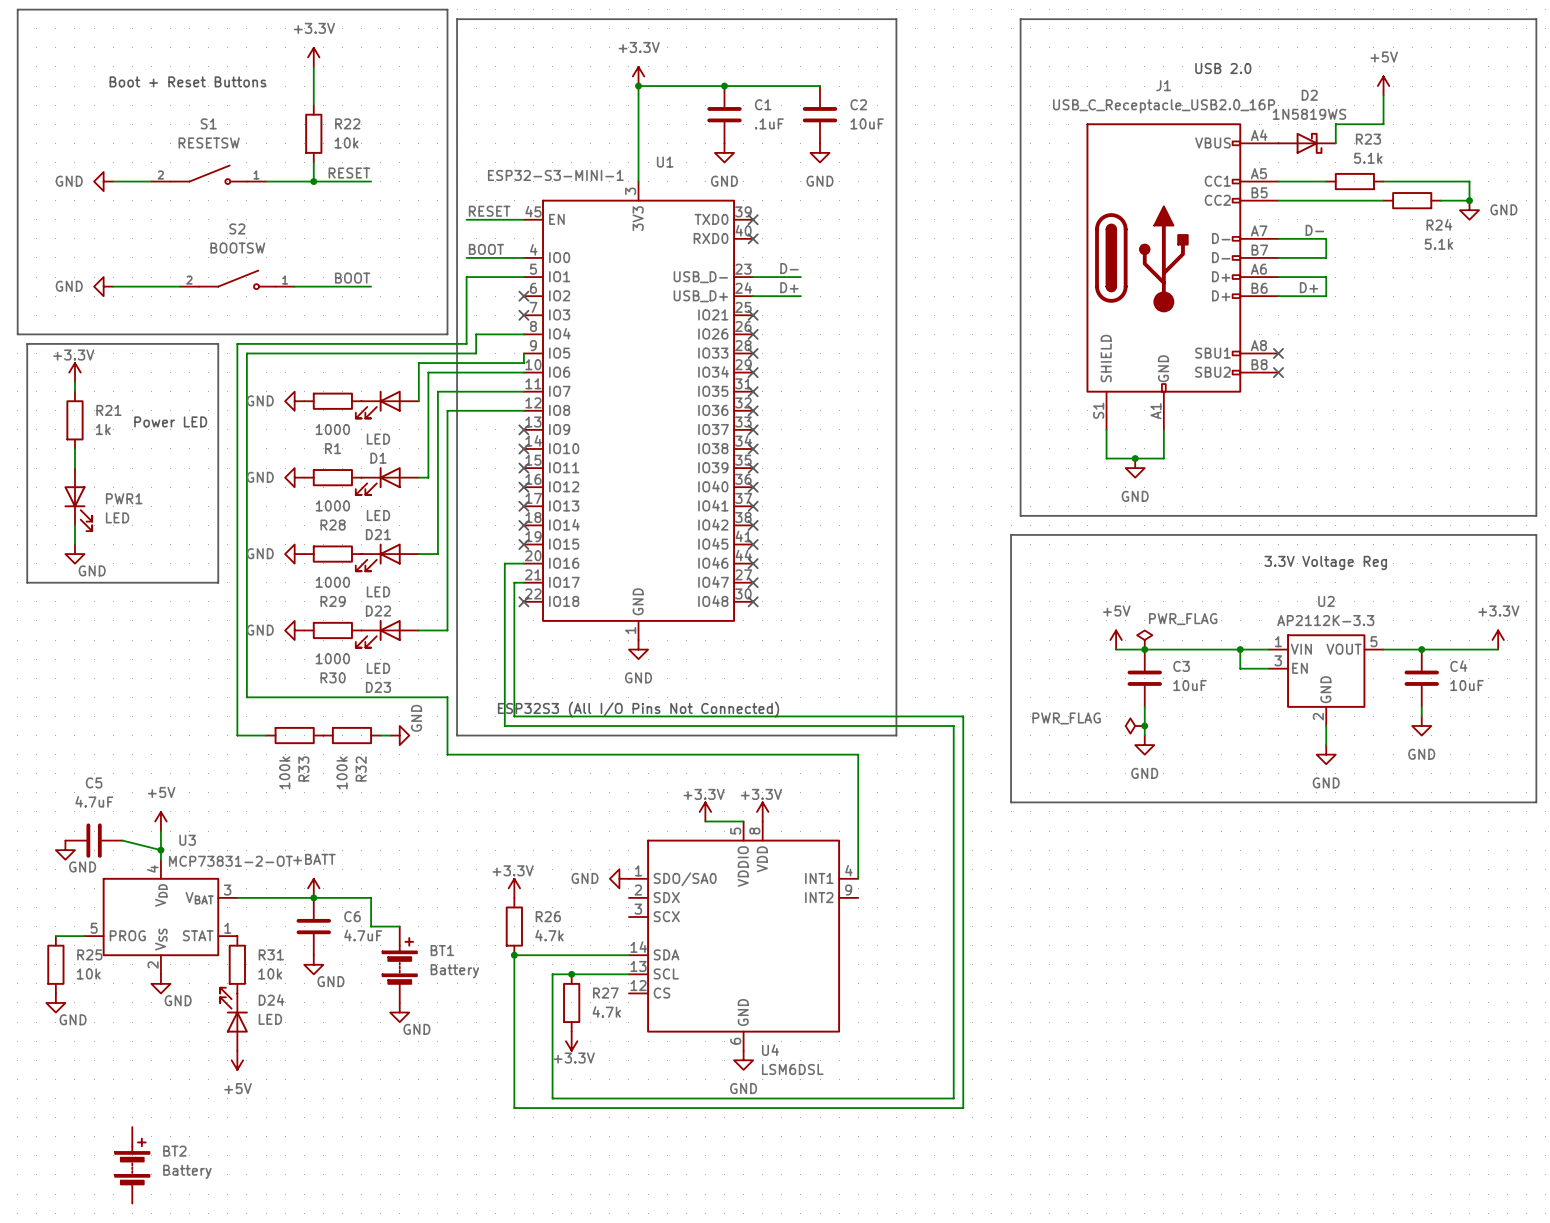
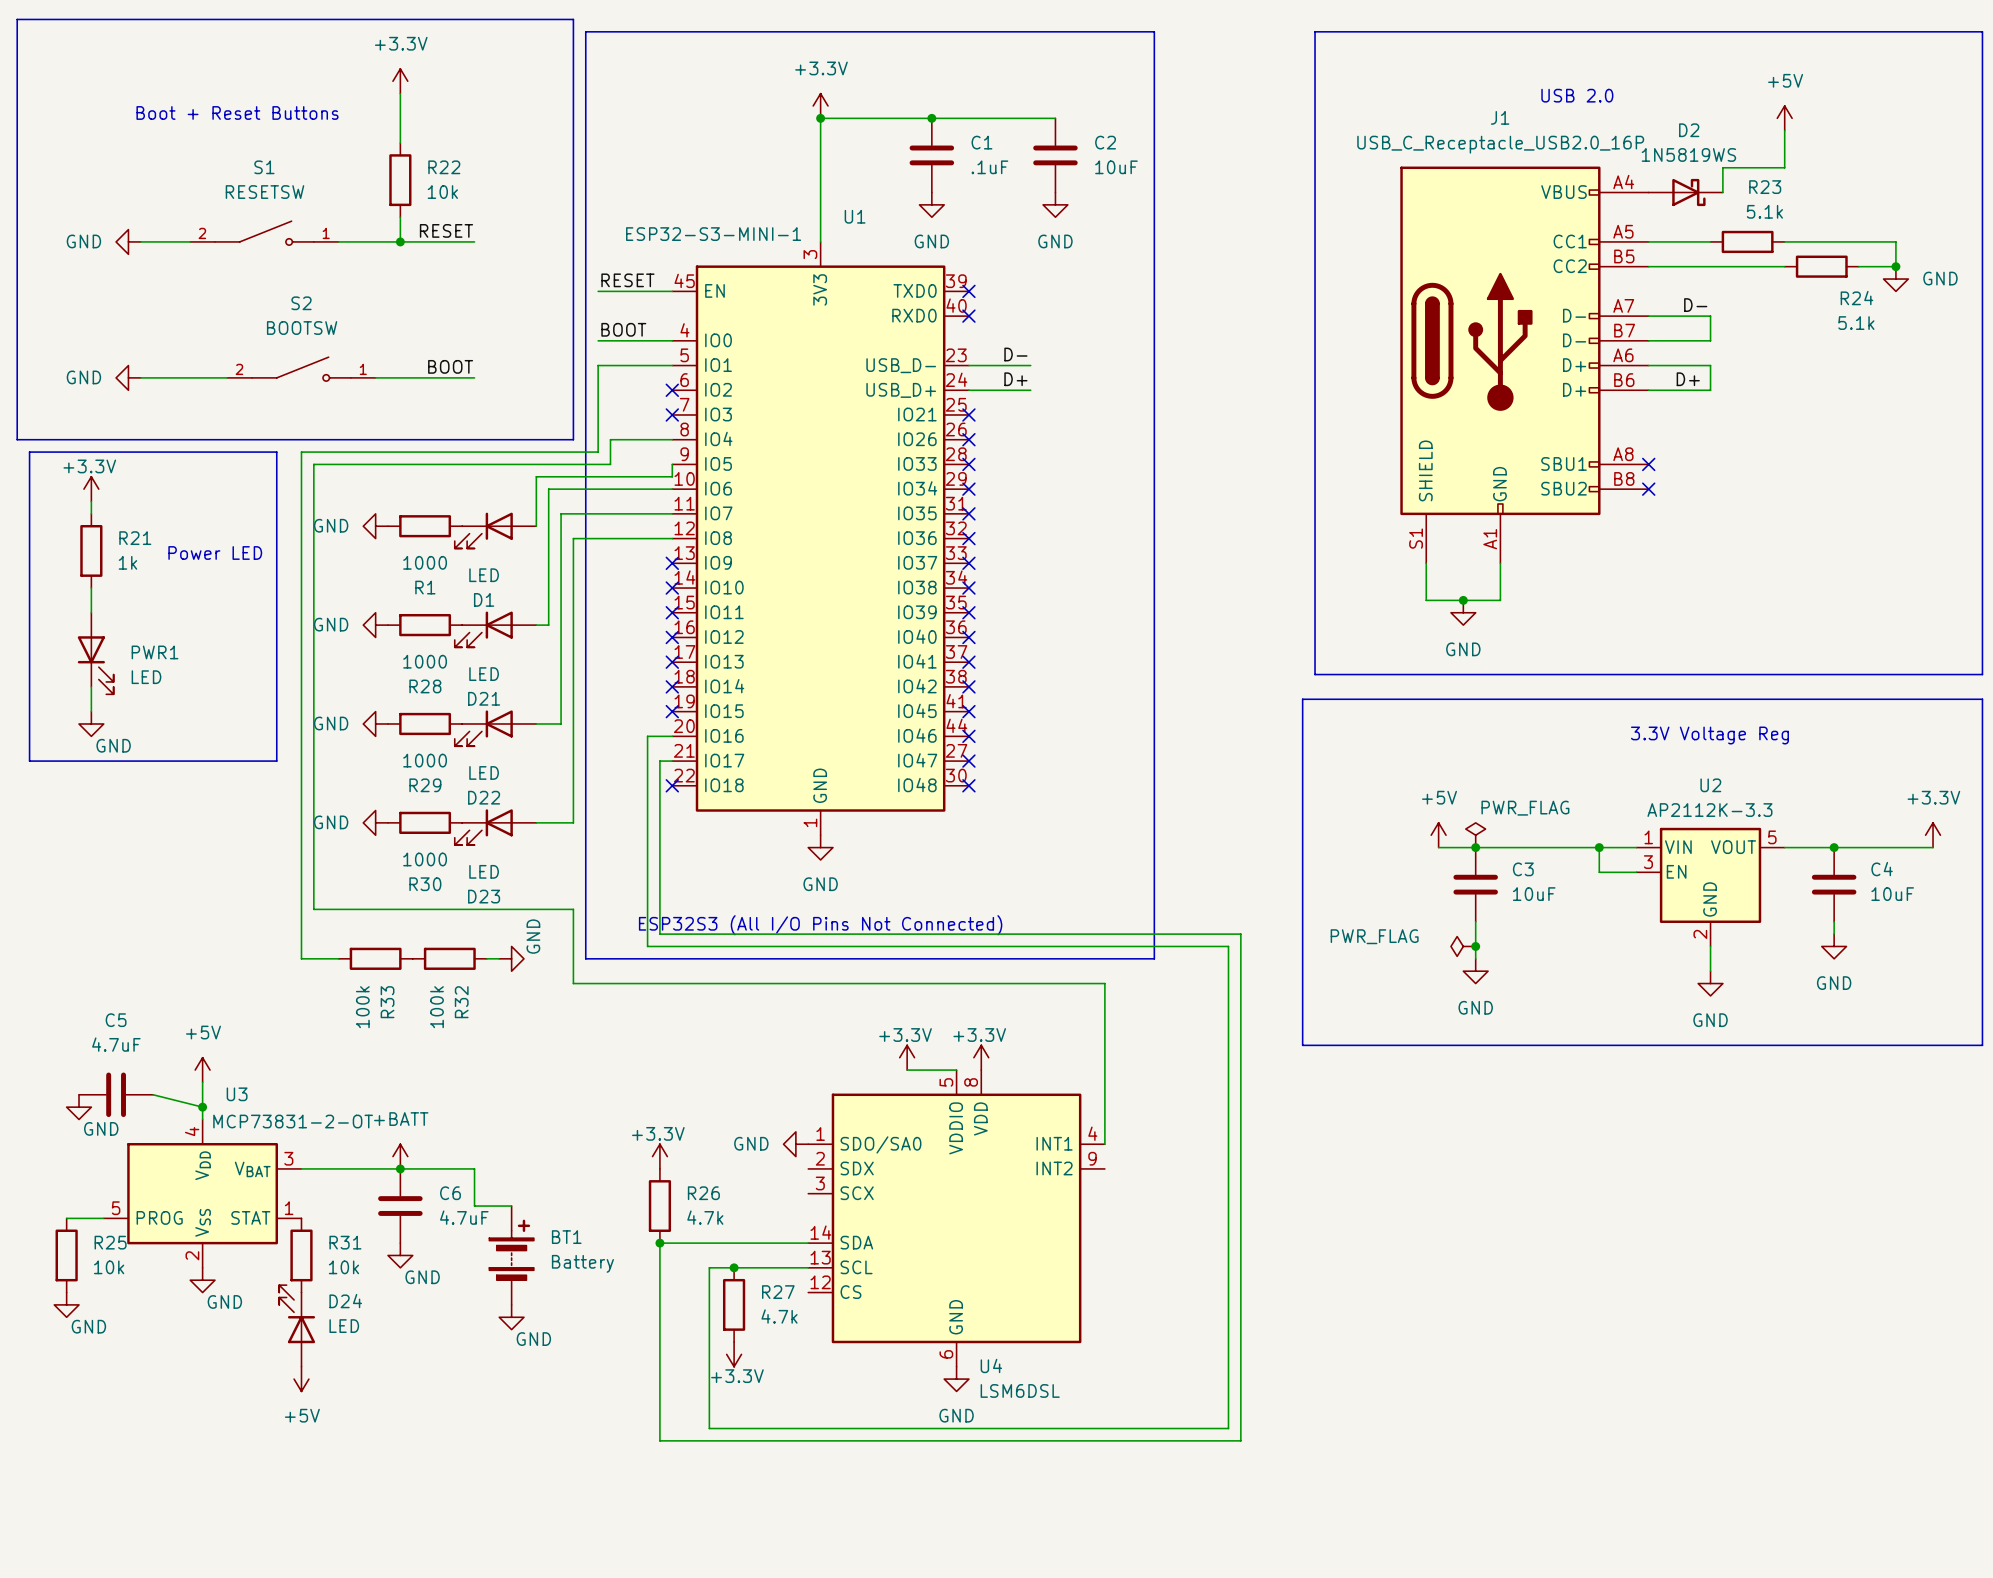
BT2: Battery (132, 1165) -> none

